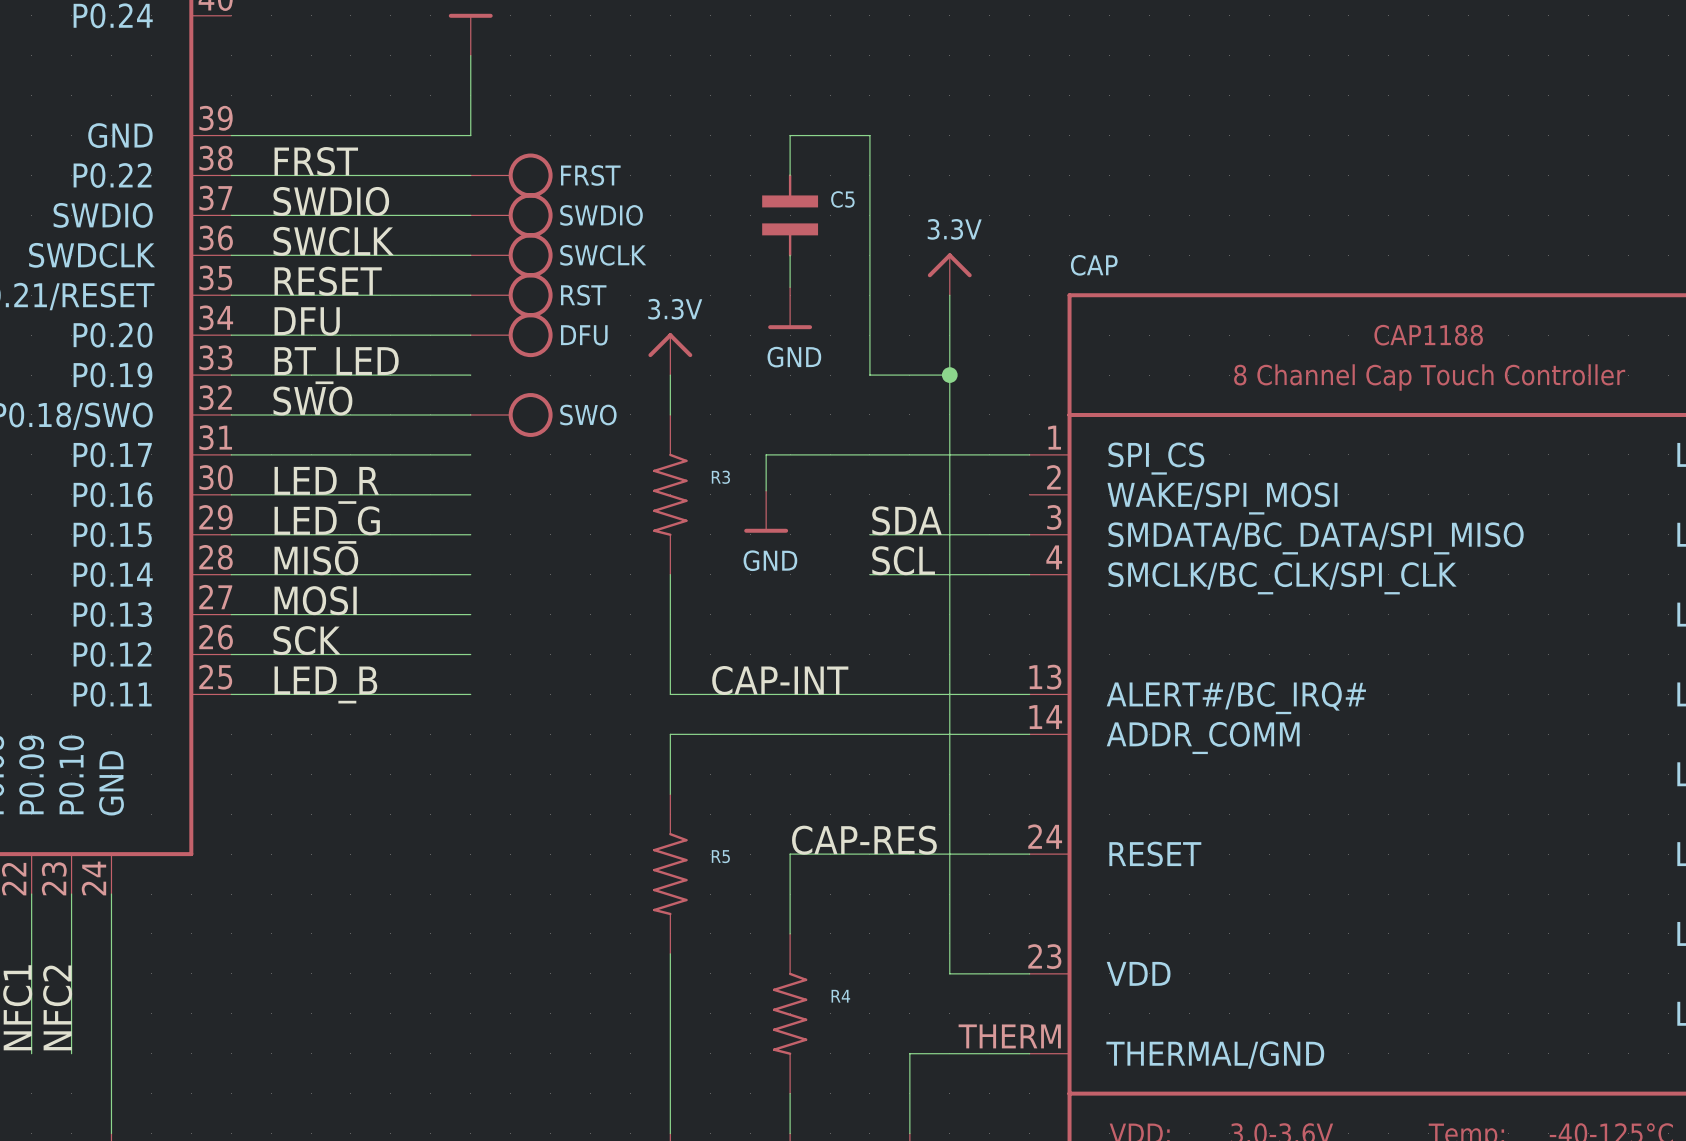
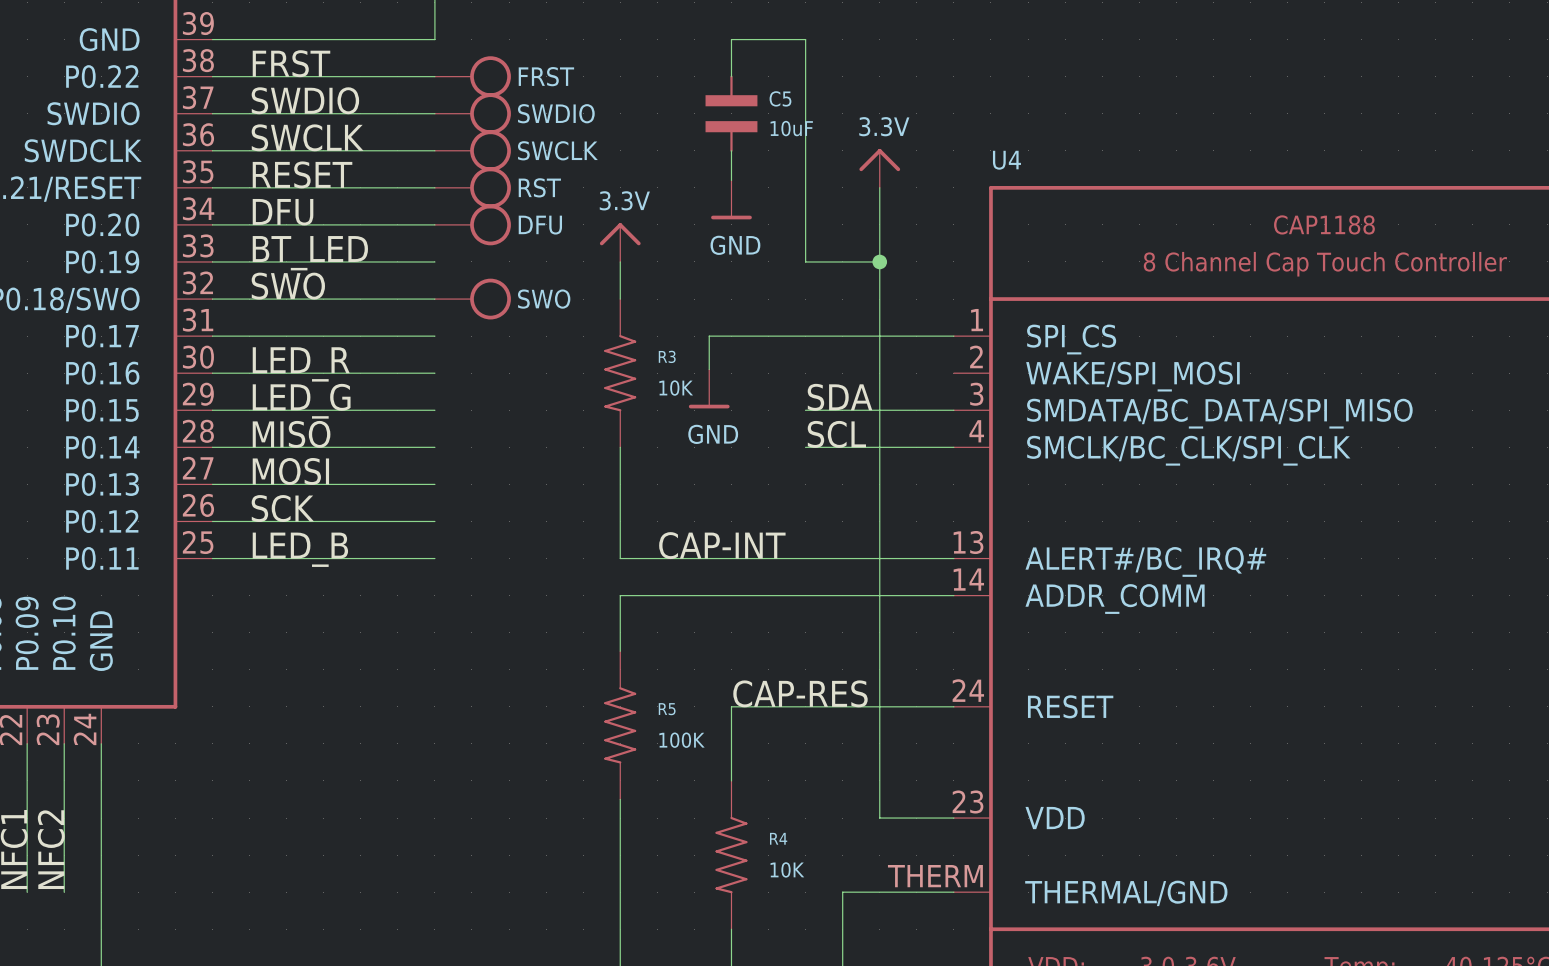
C5 value: none -> 10uF (791, 128)
CAP name: CAP (1094, 265) -> U4 (1006, 160)
R3 value: none -> 10K (676, 388)
R5 value: none -> 100K (682, 740)
R4 value: none -> 10K (787, 869)

